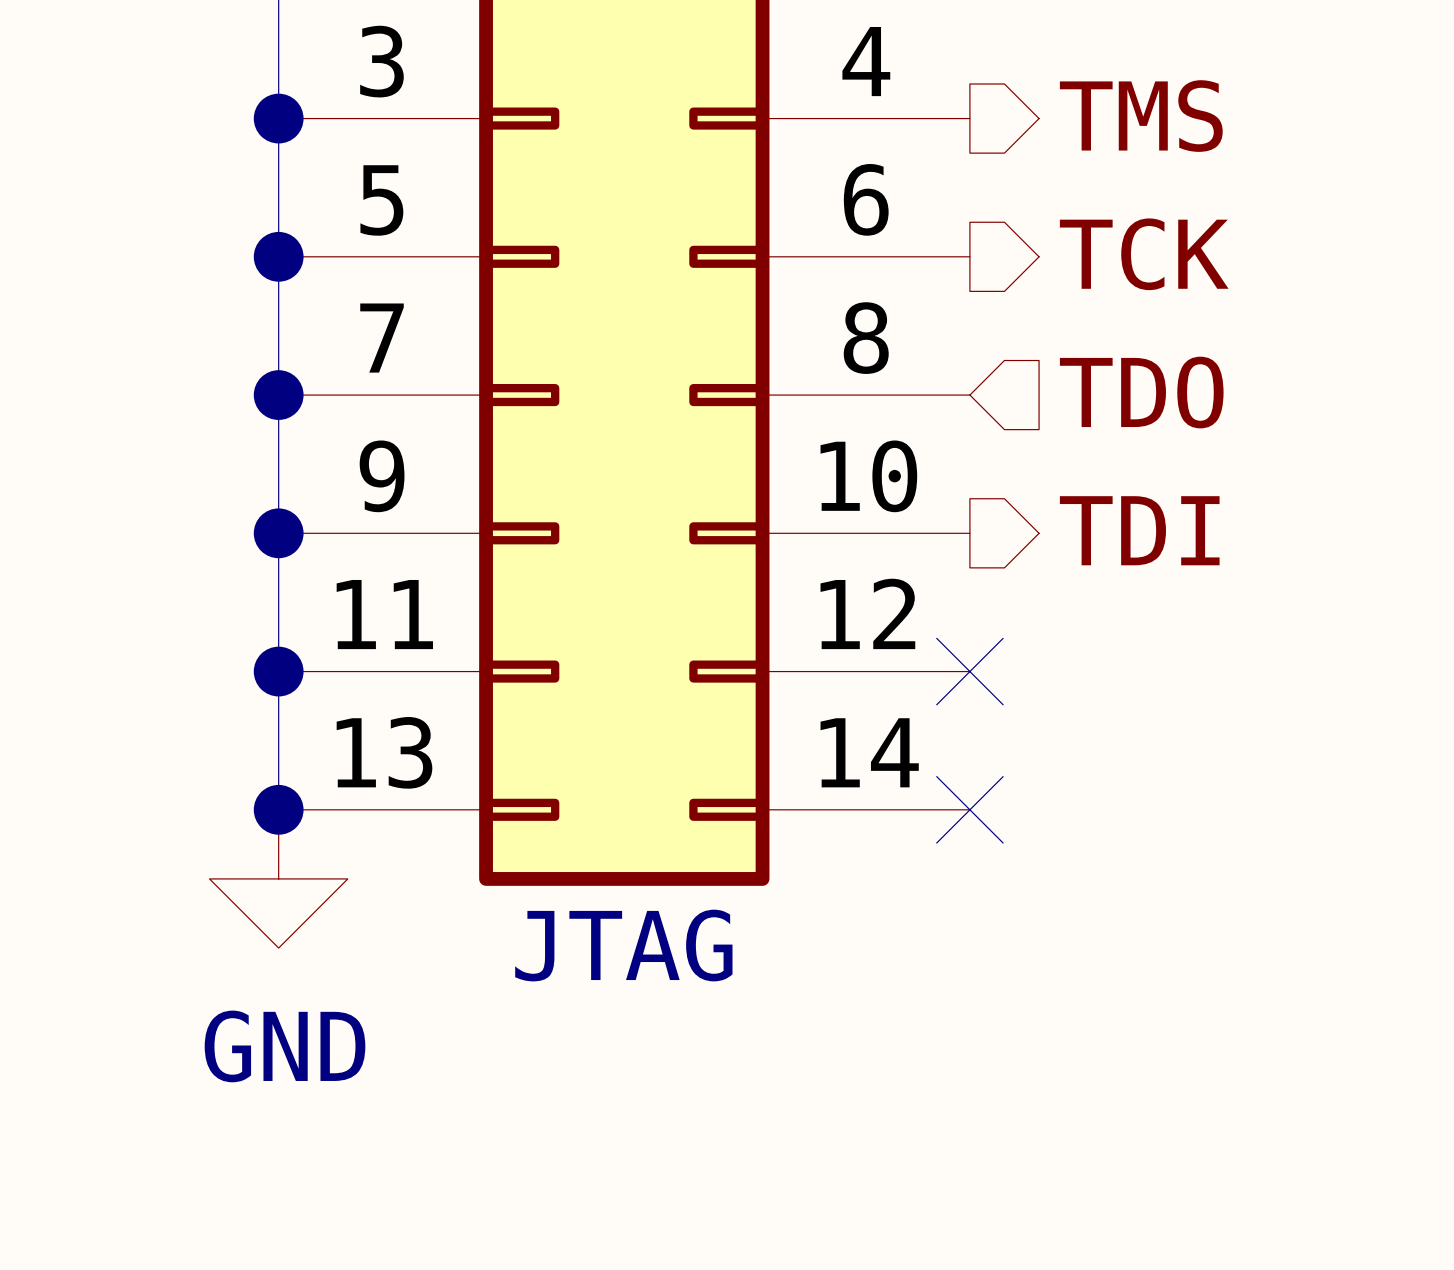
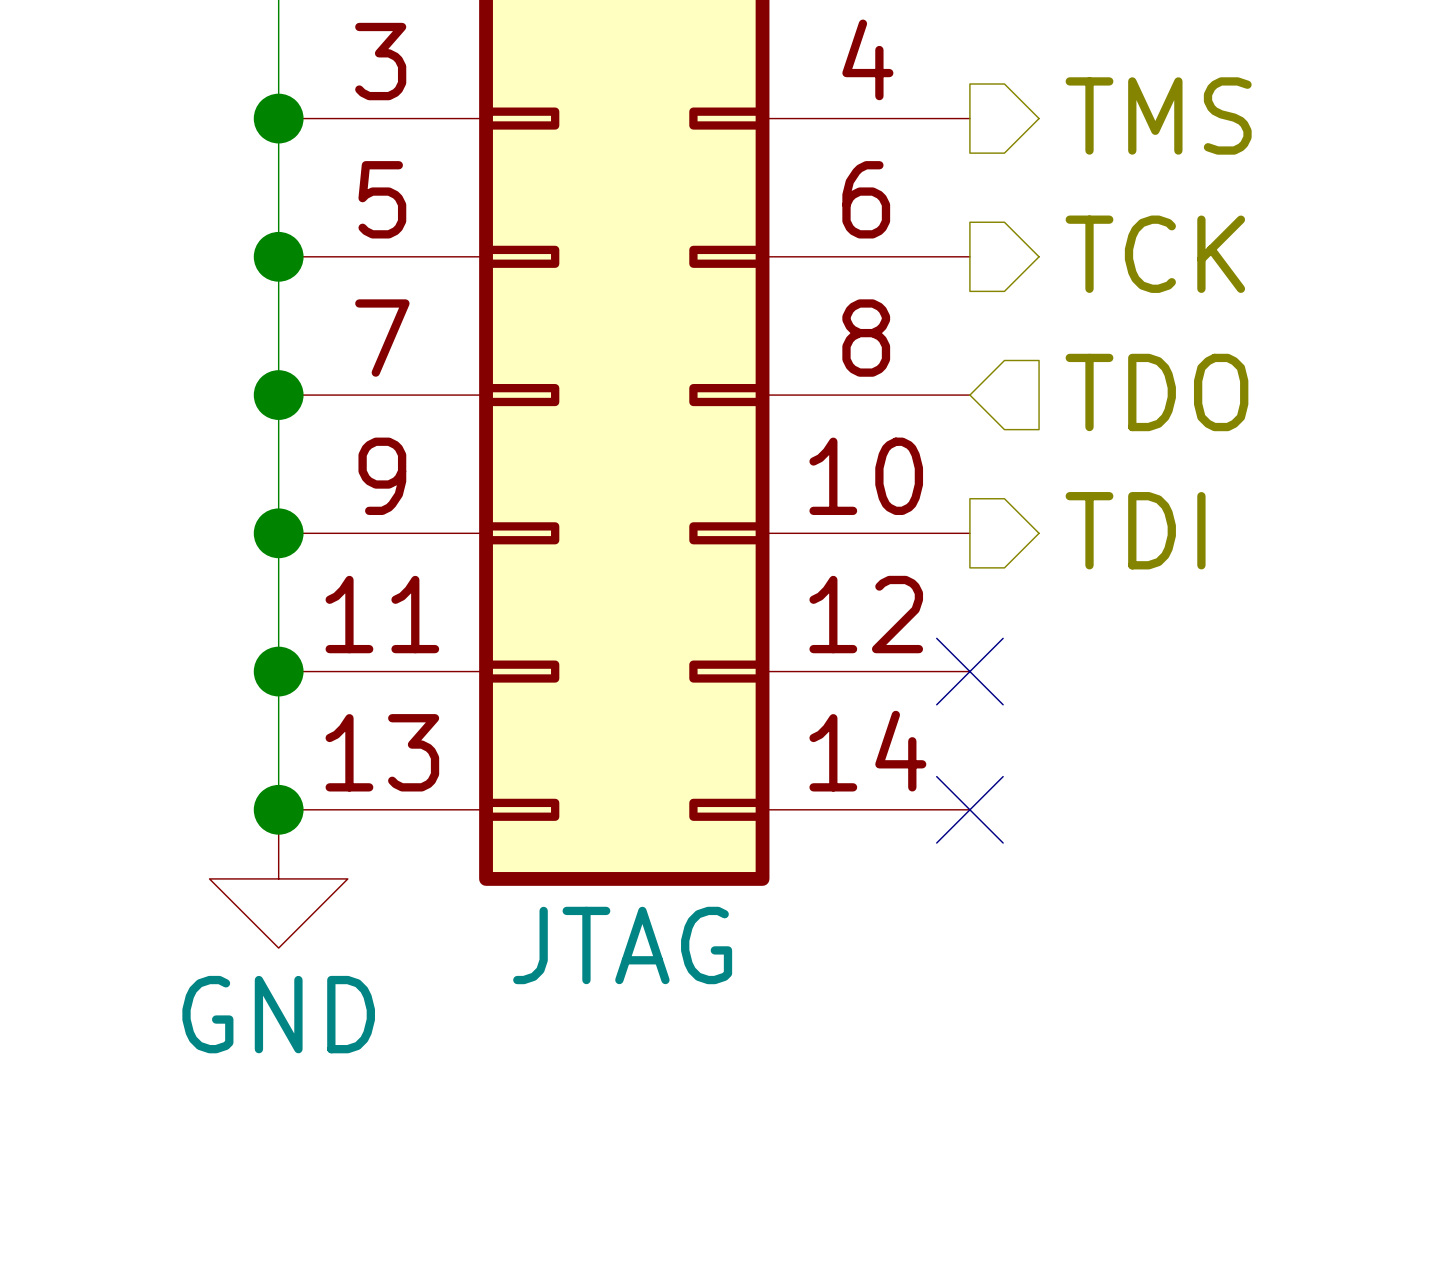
power symbol text position: GND (285, 1046) -> GND (278, 1014)

